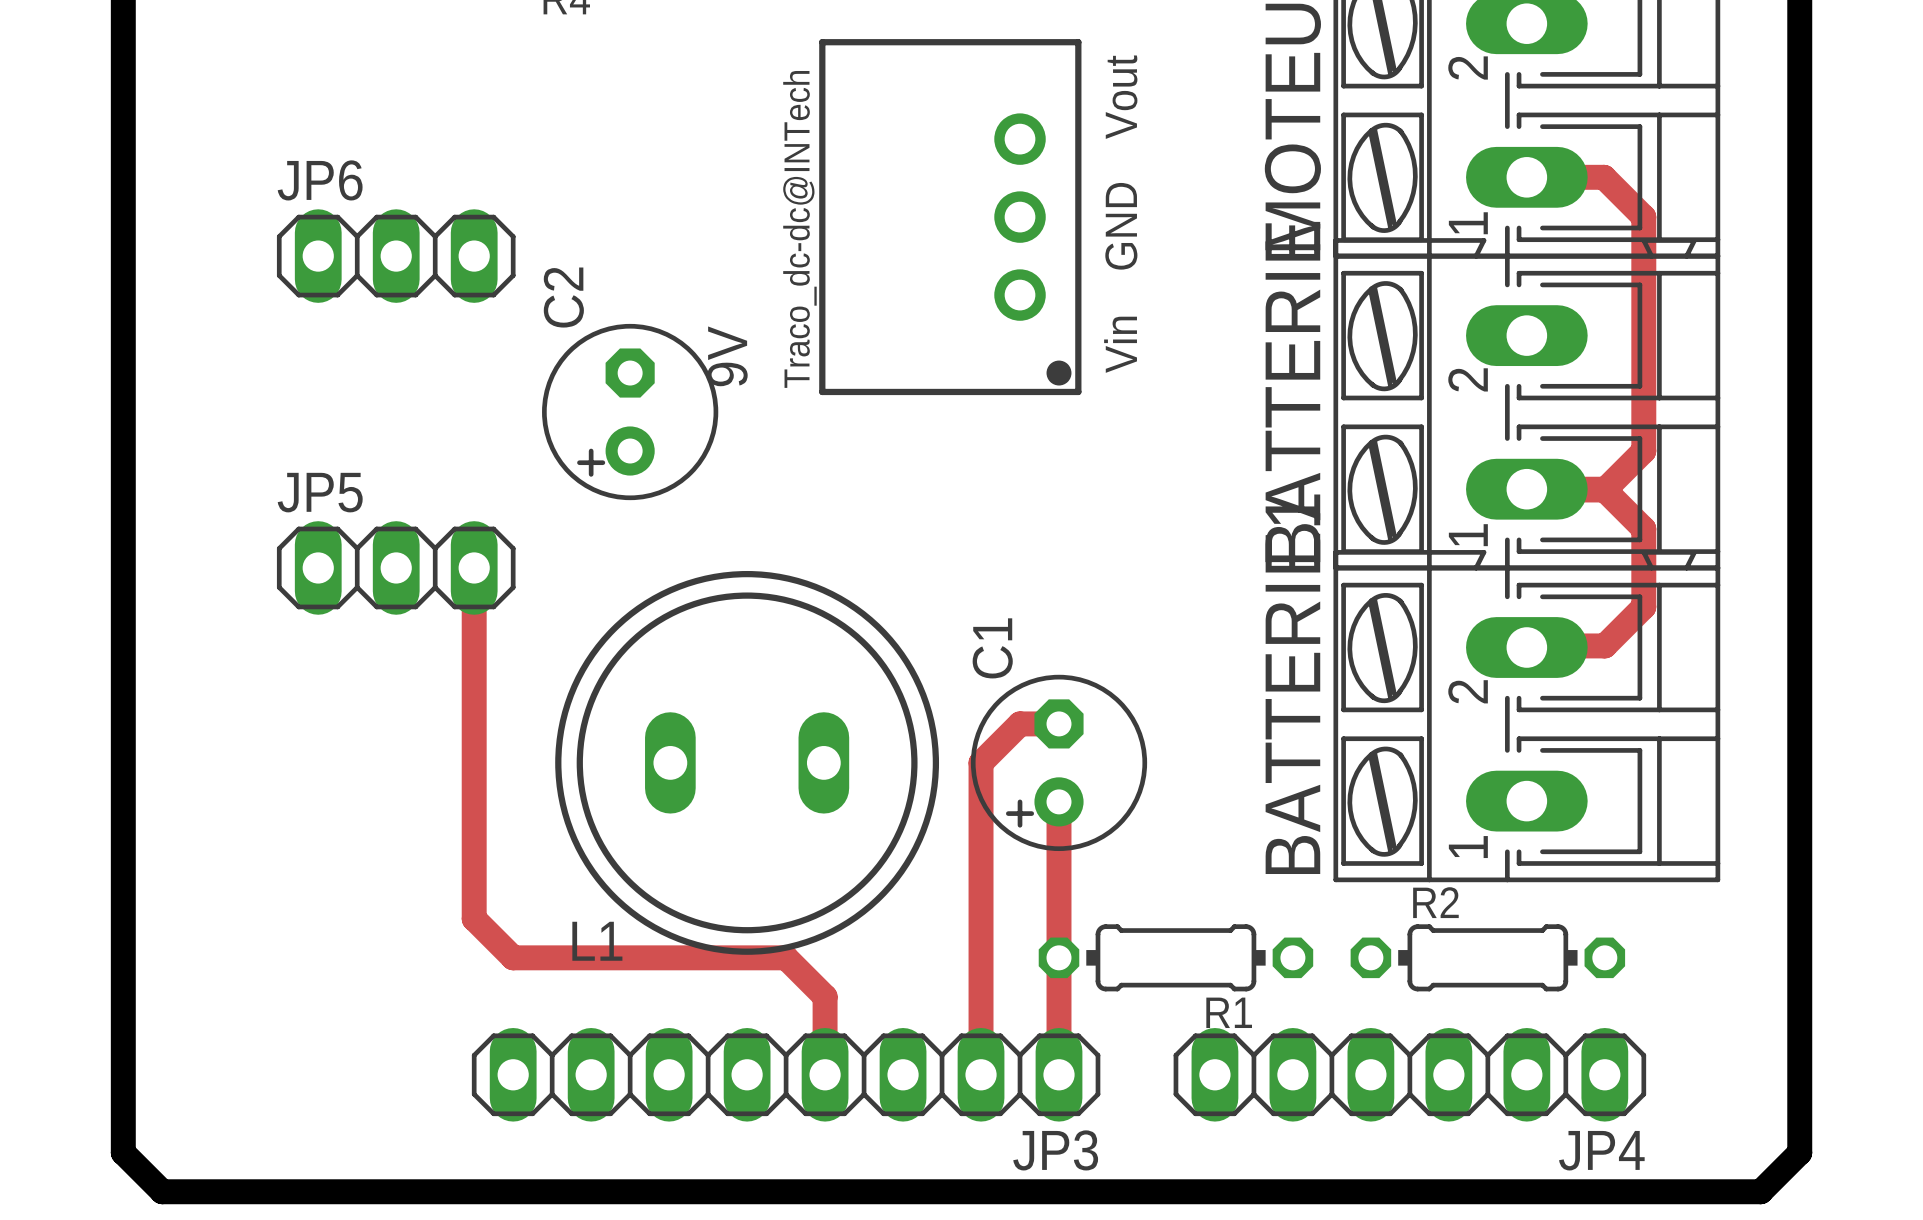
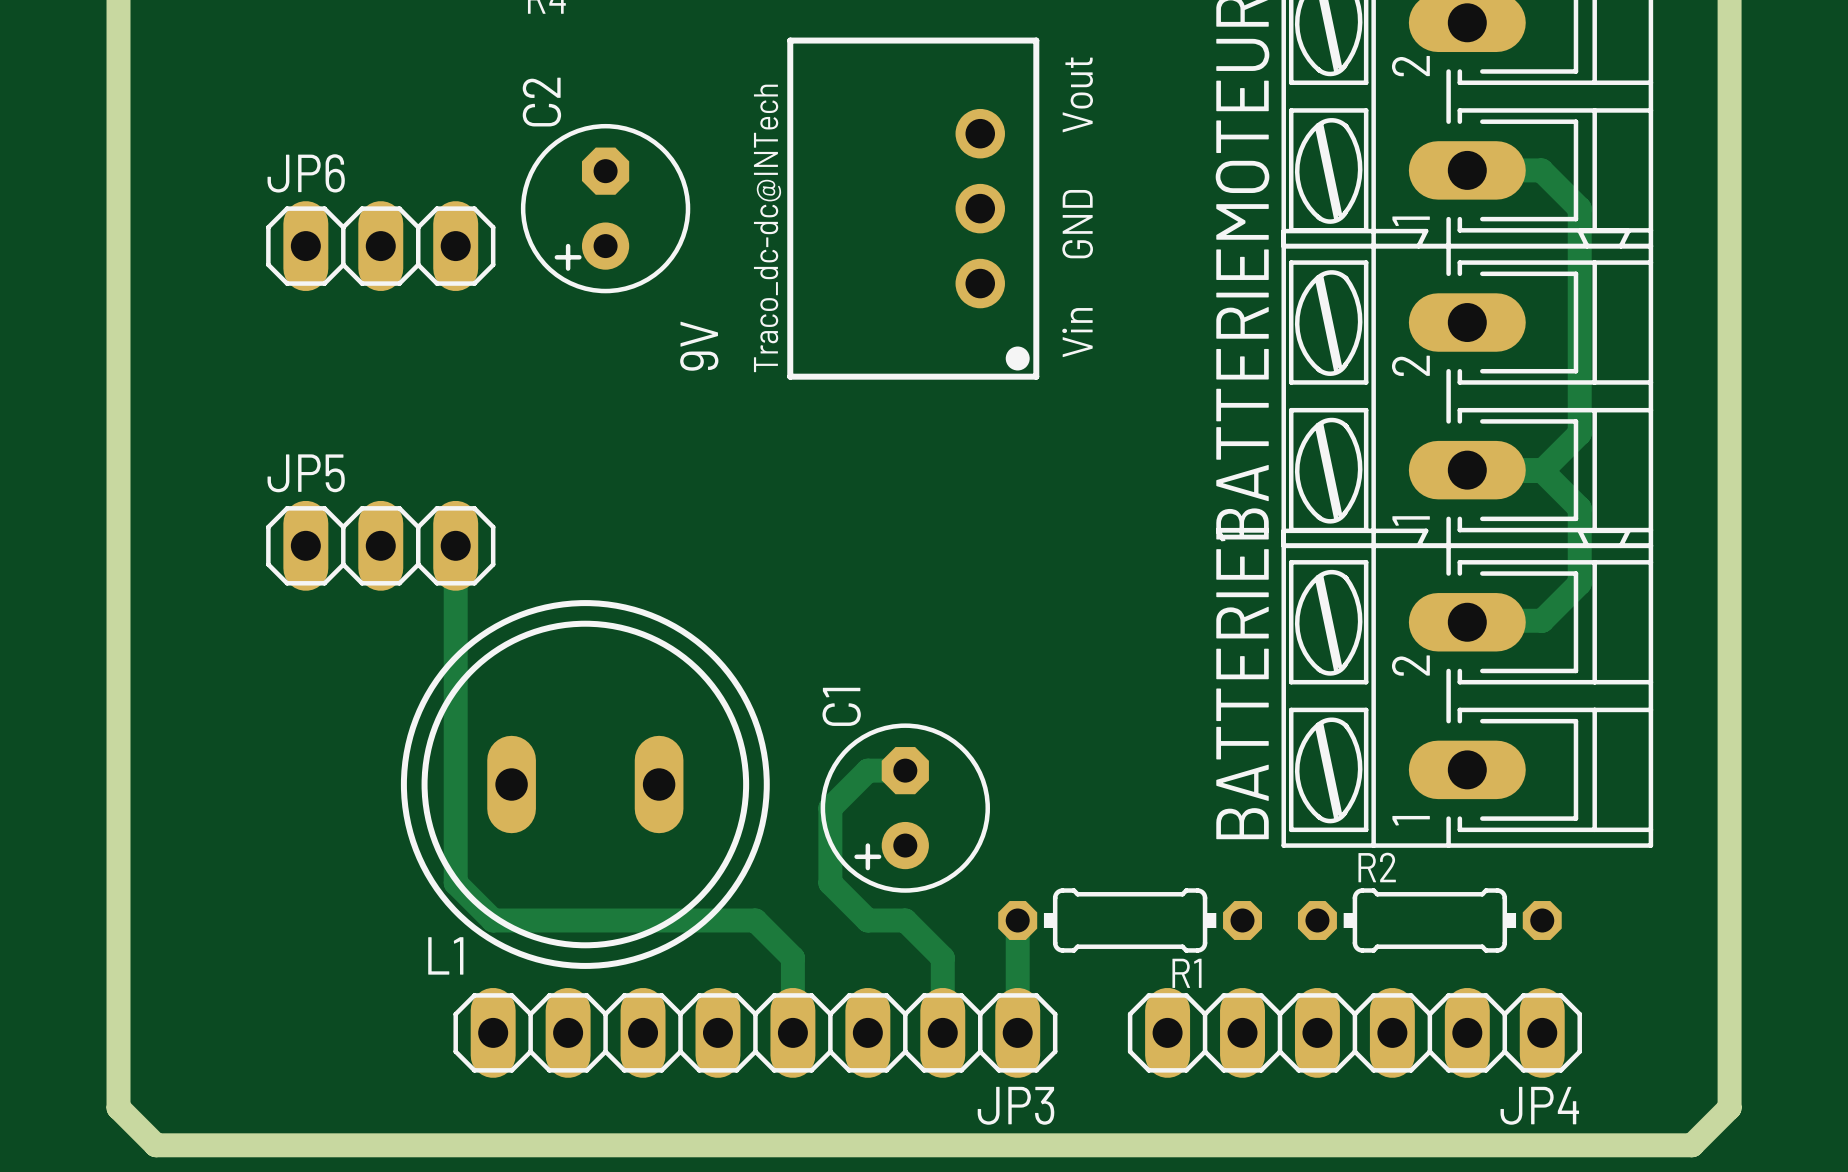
C2 position: (630, 412) -> (605, 208)
track: (1059, 723) (1020, 723) (981, 762) (981, 996) -> (905, 770) (867, 770) (830, 808) (830, 883) (867, 920) (905, 920) (942, 957)
L1 position: (747, 762) -> (585, 784)
C1 position: (1059, 762) -> (905, 808)
track: (1059, 801) (1059, 957) -> none

